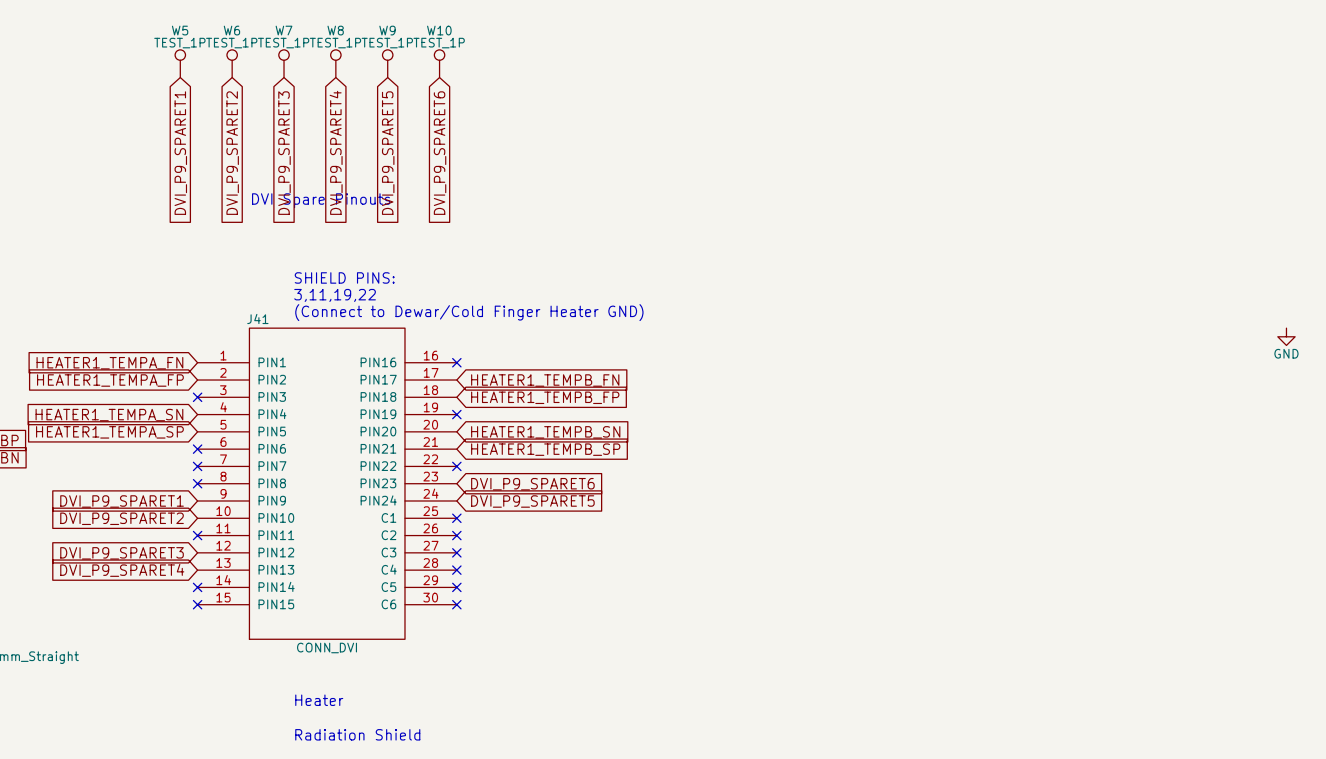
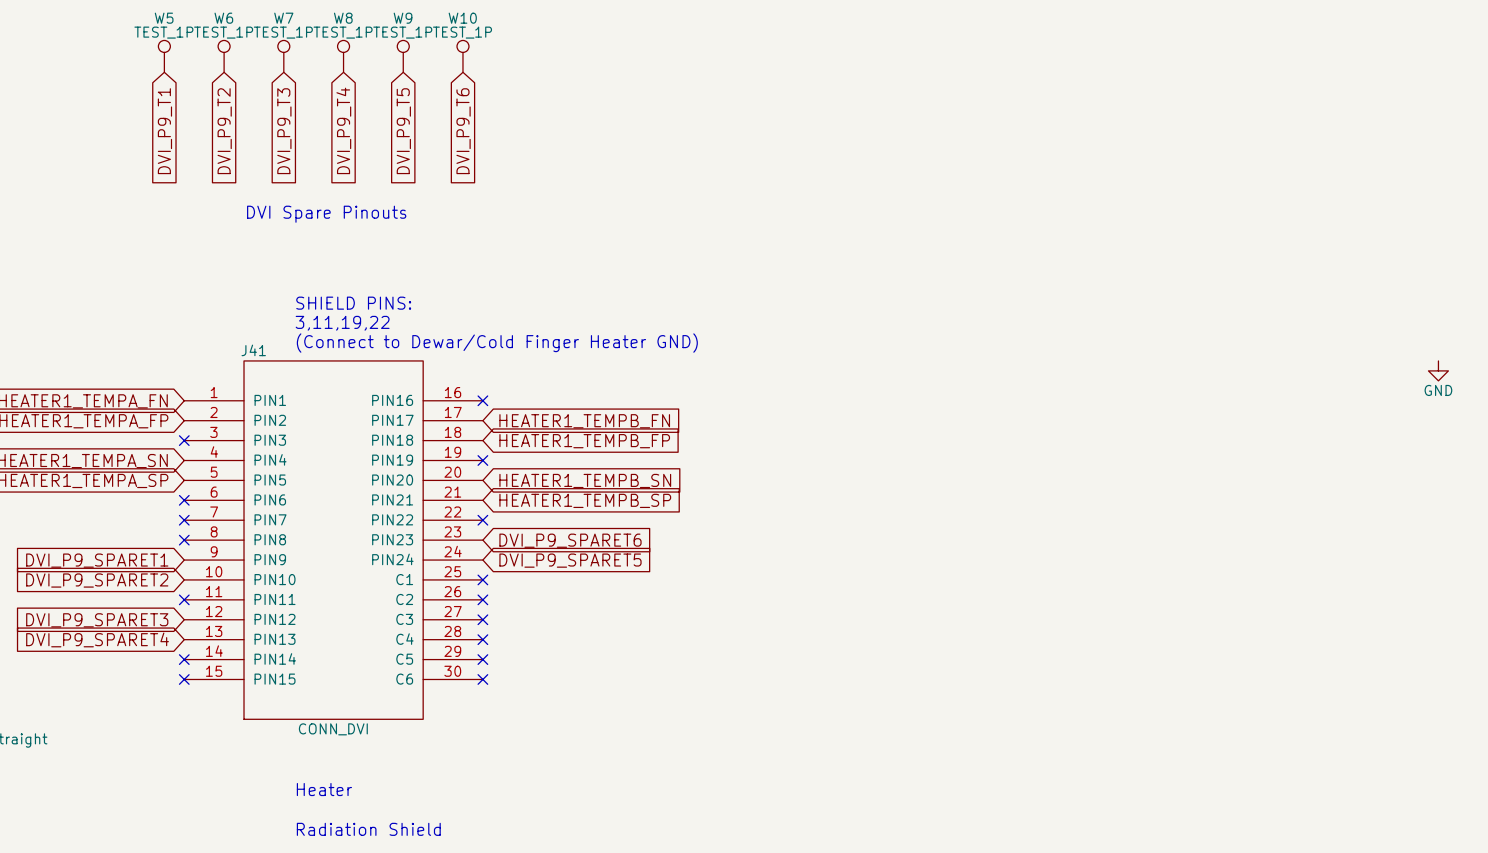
global label: DVI_P9_SPARET4 (336, 152) -> DVI_P9_T4 (343, 130)
global label: DVI_P9_SPARET1 (180, 153) -> DVI_P9_T1 (164, 131)
global label: DVI_P9_SPARET2 (232, 153) -> DVI_P9_T2 (224, 131)
global label: DVI_P9_SPARET3 (284, 153) -> DVI_P9_T3 (284, 131)
global label: DVI_P9_SPARET5 (388, 153) -> DVI_P9_T5 (403, 131)
global label: DVI_P9_SPARET6 (440, 153) -> DVI_P9_T6 (463, 131)

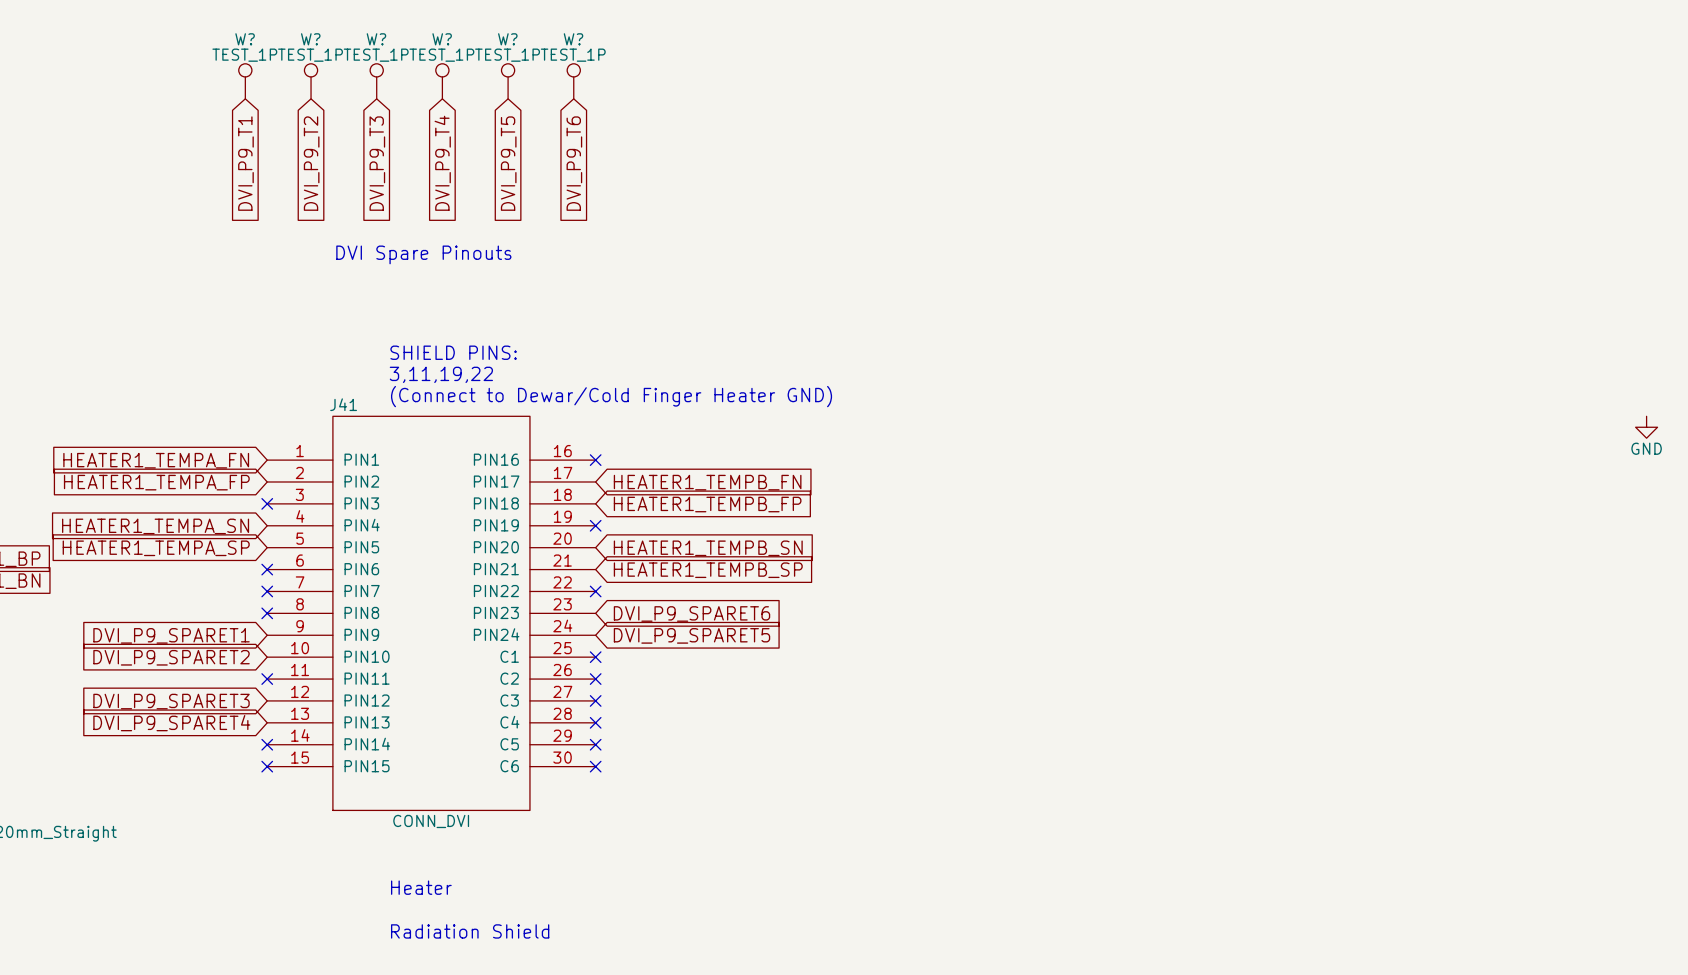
W5 name: W5 (164, 18) -> W? (245, 39)
W6 name: W6 (223, 18) -> W? (310, 39)
W7 name: W7 (283, 18) -> W? (376, 39)
W8 name: W8 (343, 18) -> W? (442, 39)
W9 name: W9 (403, 18) -> W? (507, 39)
W10 name: W10 (462, 18) -> W? (573, 39)

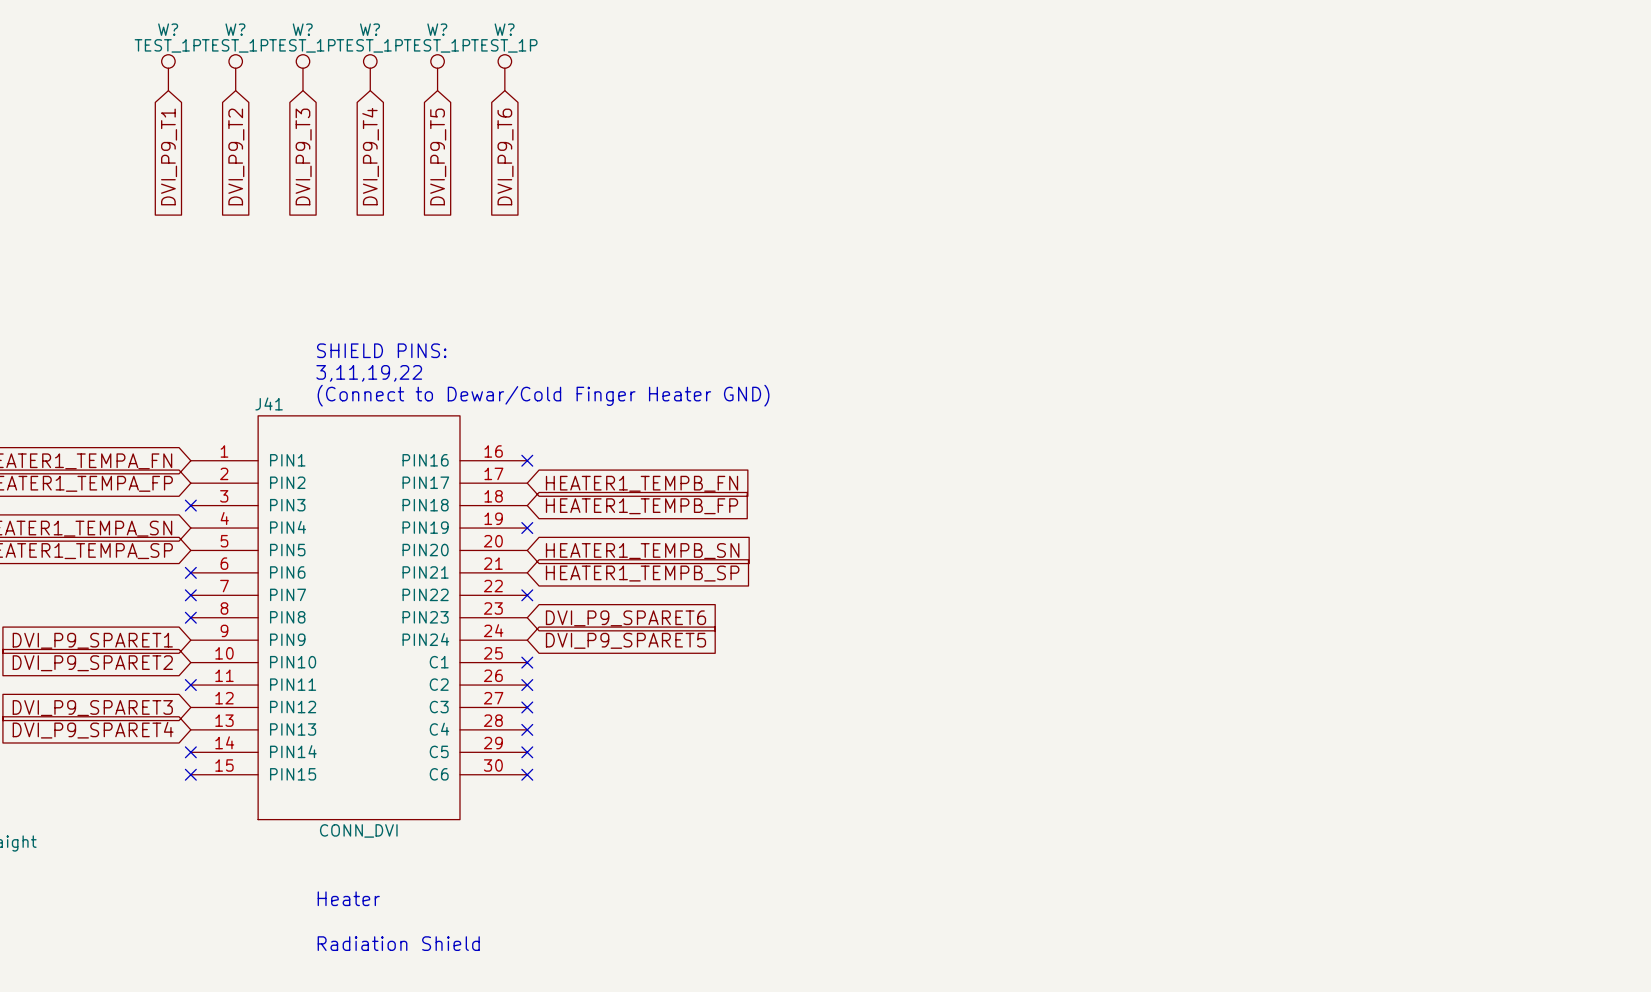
text: DVI Spare Pinouts (423, 254) -> none
power symbol: GND (1646, 427) -> none

